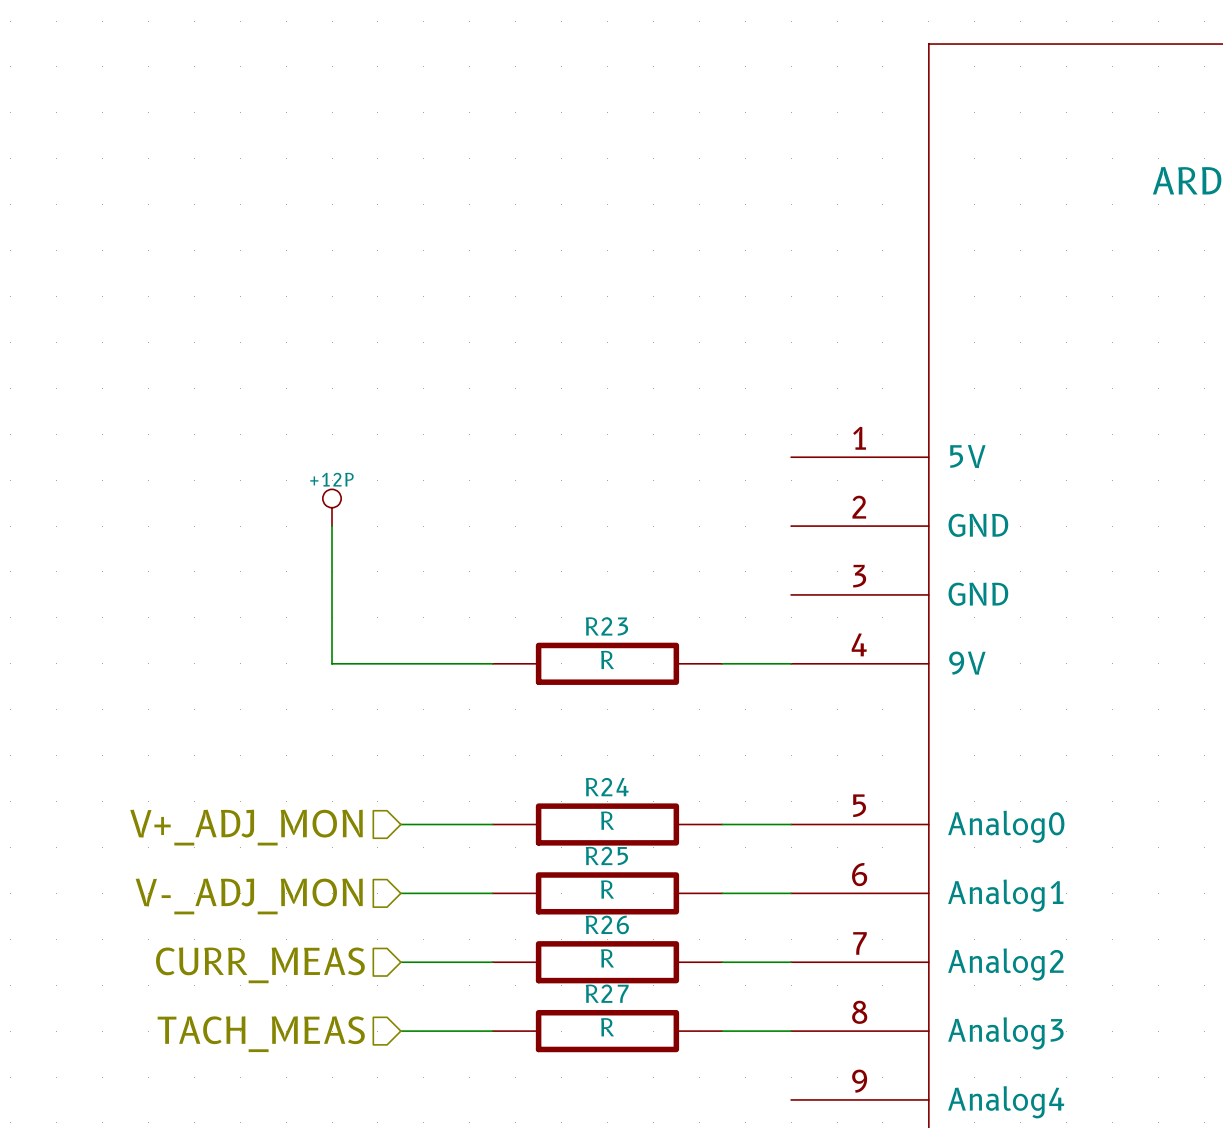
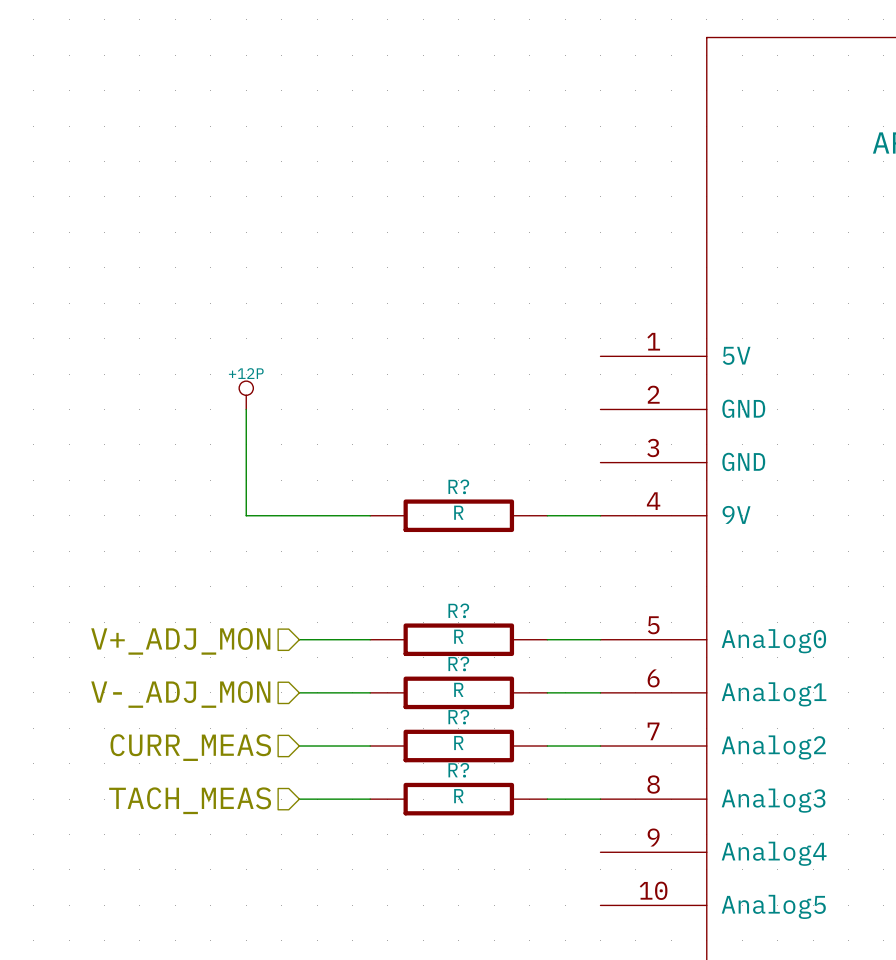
R23 name: R23 (606, 626) -> R? (458, 486)
R24 name: R24 (607, 787) -> R? (458, 610)
R25 name: R25 (606, 855) -> R? (458, 663)
R26 name: R26 (607, 924) -> R? (458, 717)
R27 name: R27 (607, 993) -> R? (458, 770)

